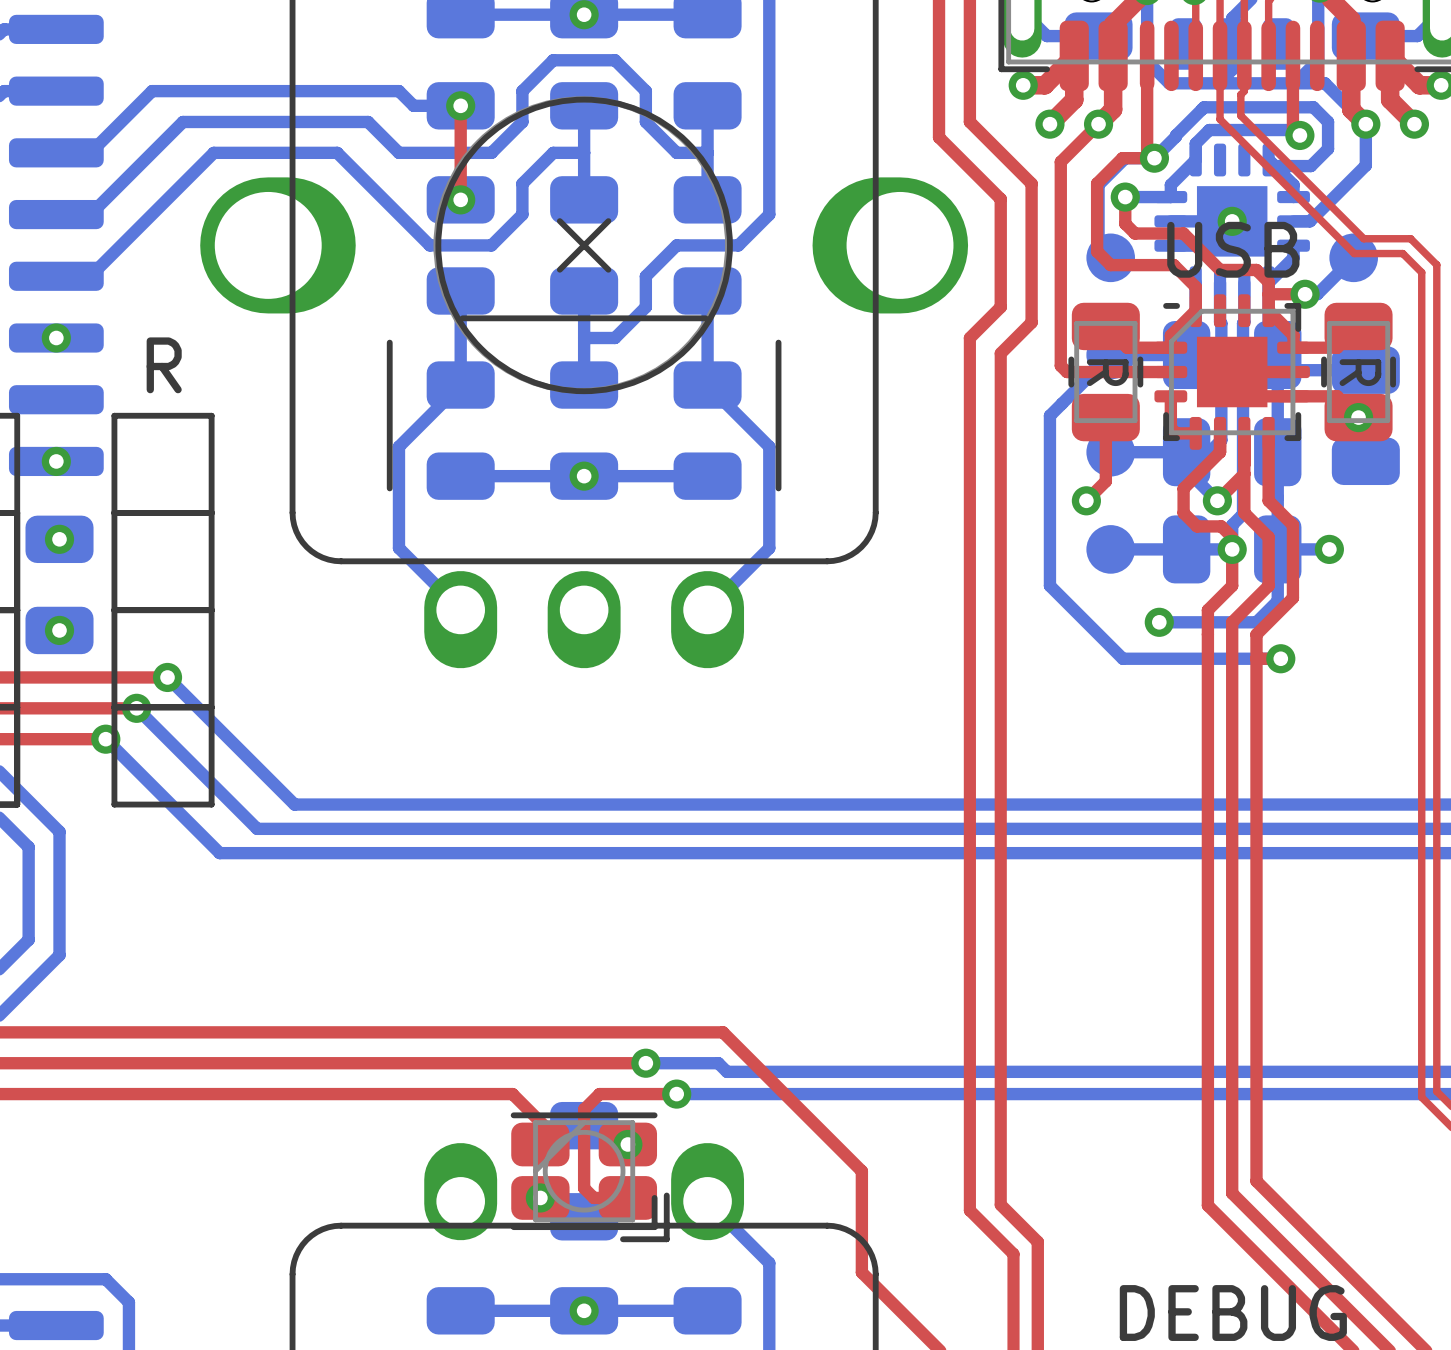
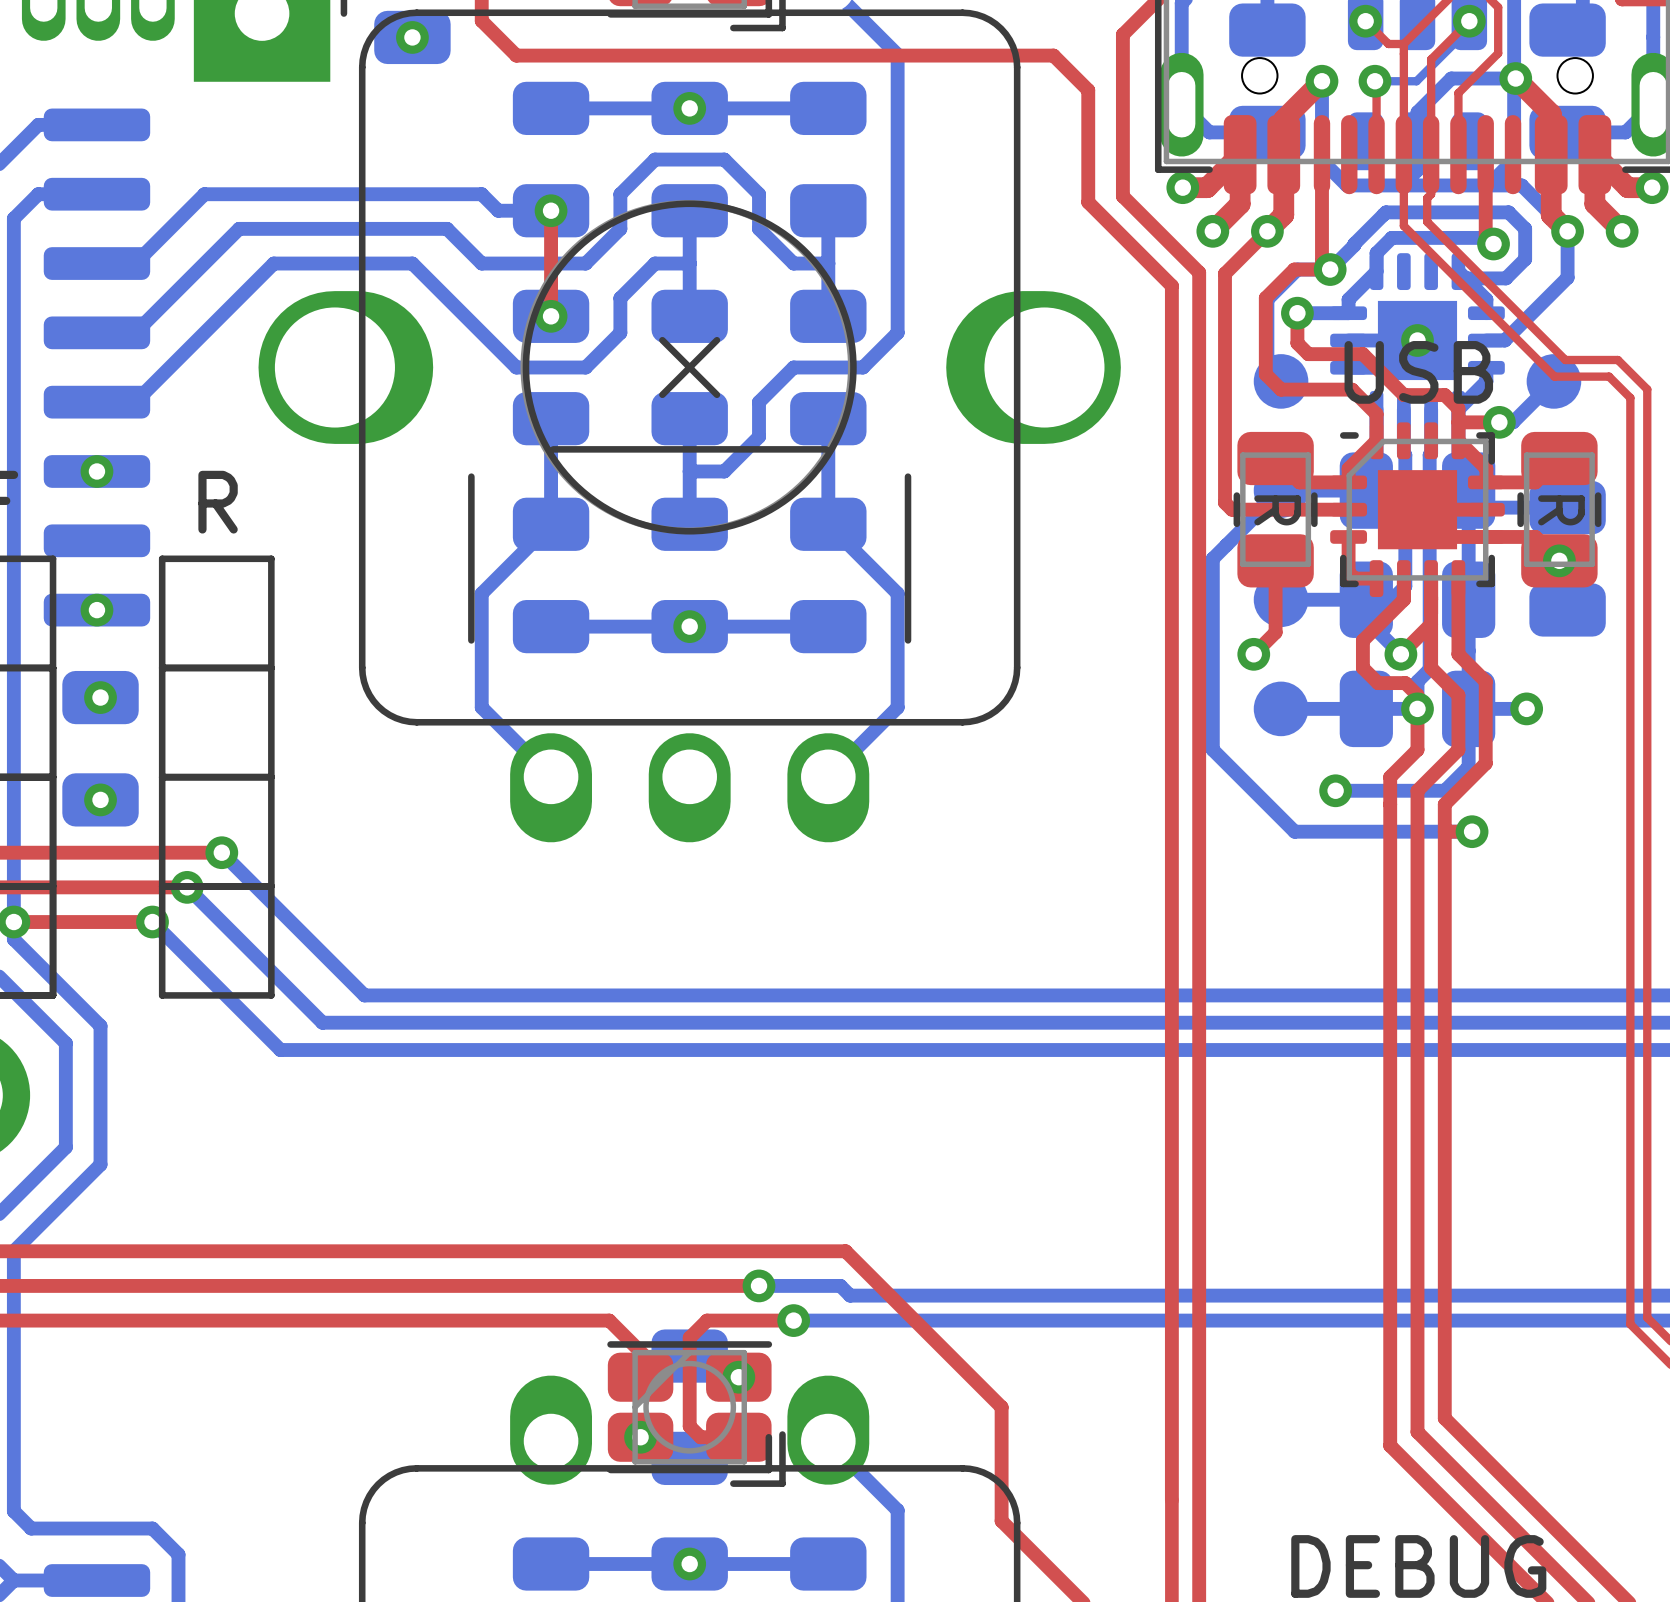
top track: (969, 93) (969, 121) (1031, 183) (1031, 322) (1000, 353) (1000, 1204) (1037, 1241) -> (1122, 196) (1199, 272) (1199, 1486)
top track: (939, 98) (939, 137) (1000, 199) (1000, 307) (969, 338) (969, 1210) (1013, 1254) -> (1088, 202) (1171, 285) (1171, 1500)

